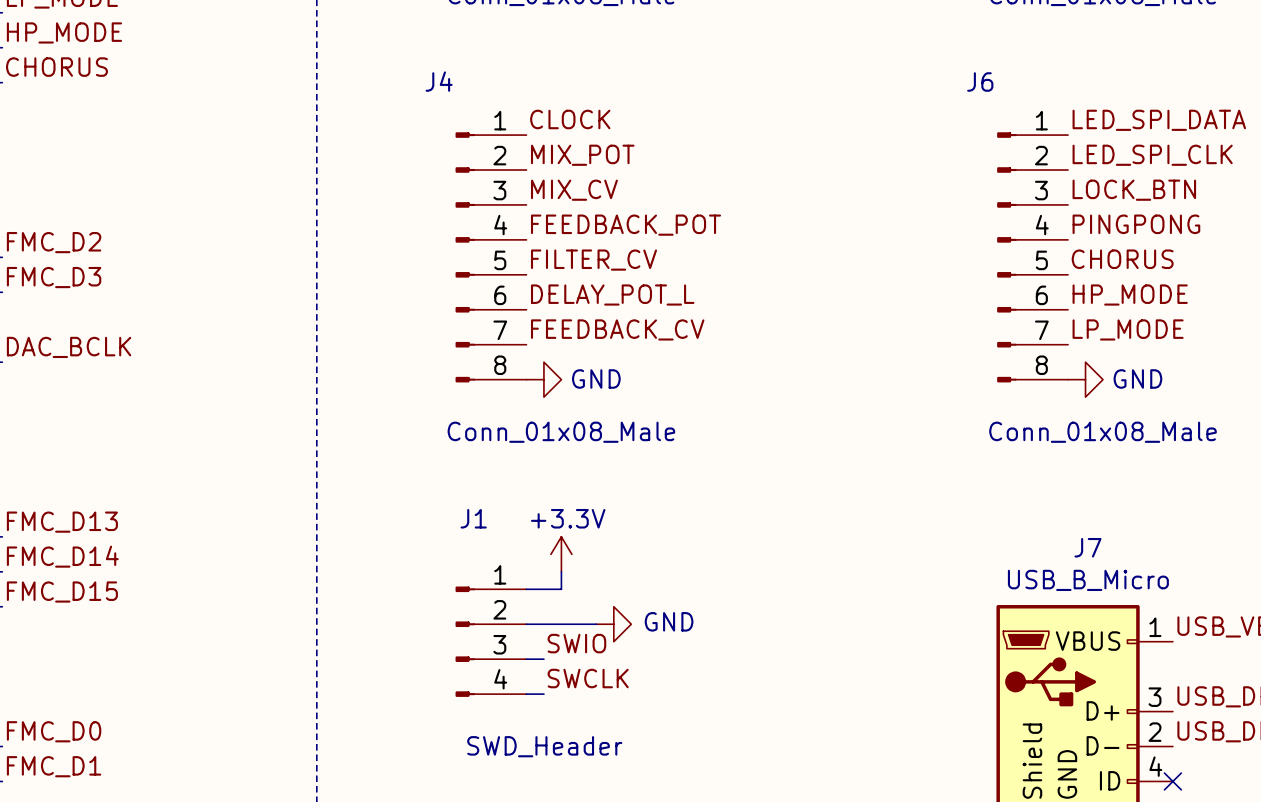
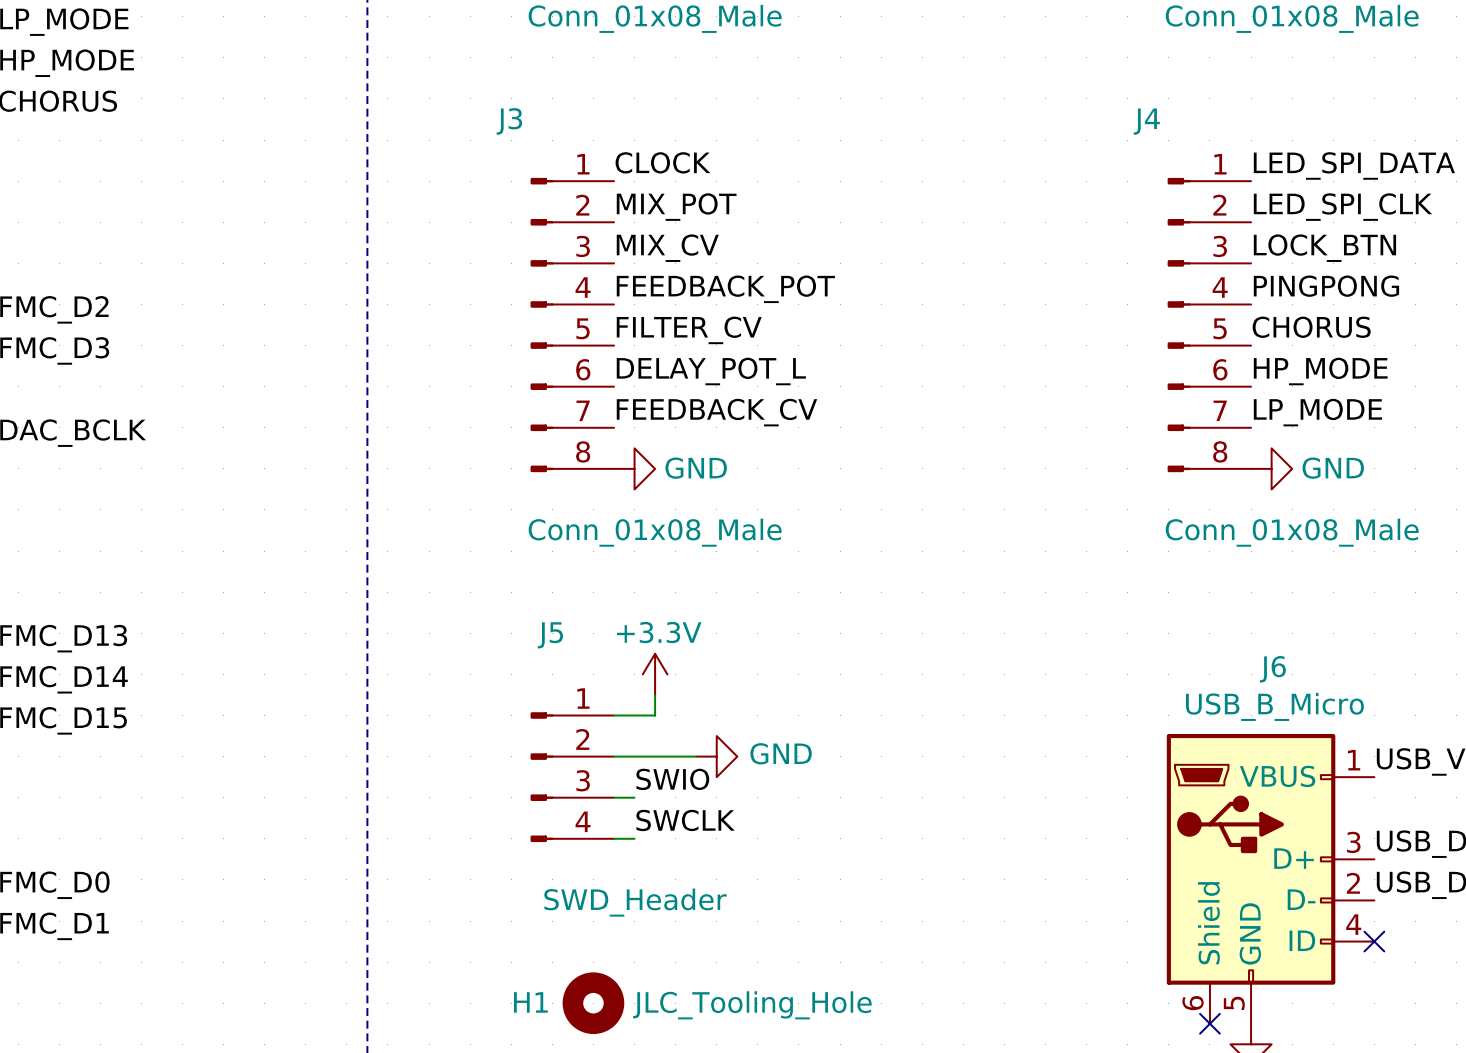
J4 name: J4 (439, 81) -> J3 (509, 121)
J6 name: J6 (980, 82) -> J4 (1146, 121)
J1 name: J1 (473, 518) -> J5 (550, 635)
J7 name: J7 (1087, 547) -> J6 (1272, 669)

